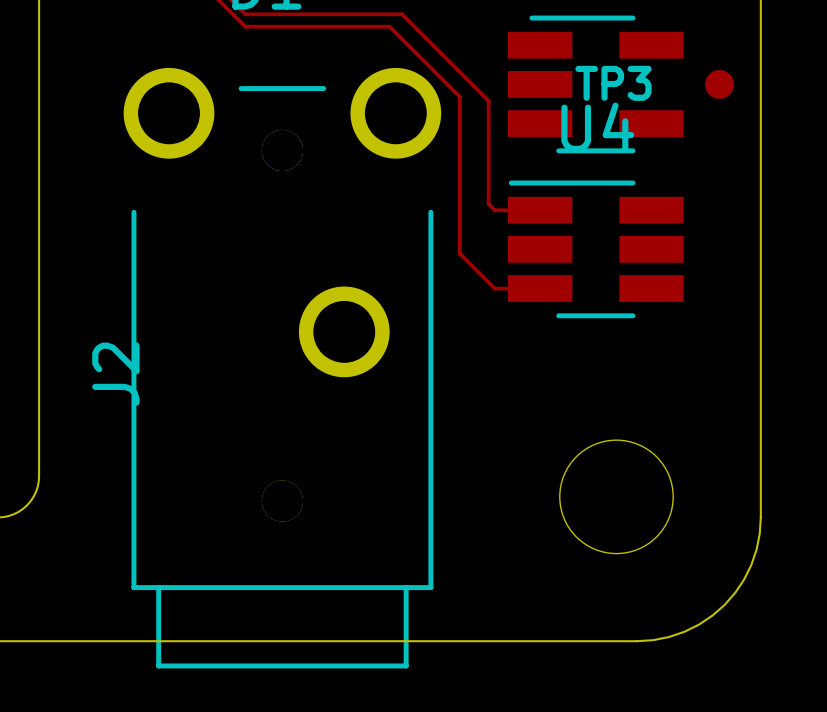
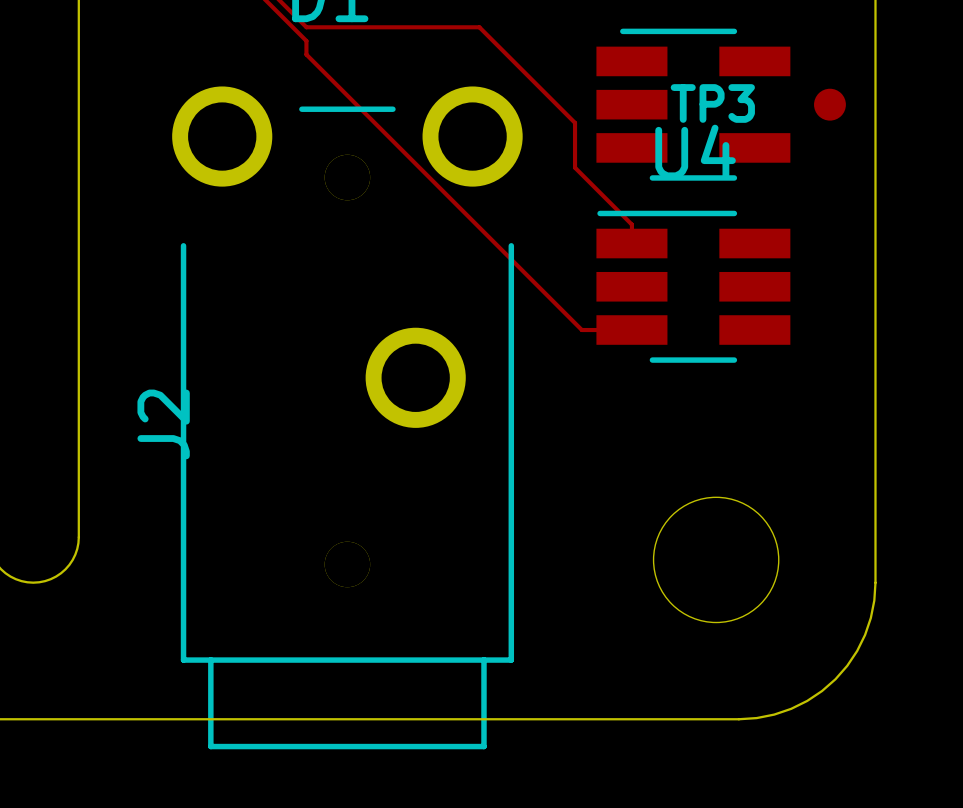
track: (245, 26) (389, 26) (459, 96) (459, 253) -> (306, 40) (306, 54) (543, 291)
track: (488, 141) (488, 204) (494, 210) (540, 210) -> (575, 167) (631, 224) (631, 243)

